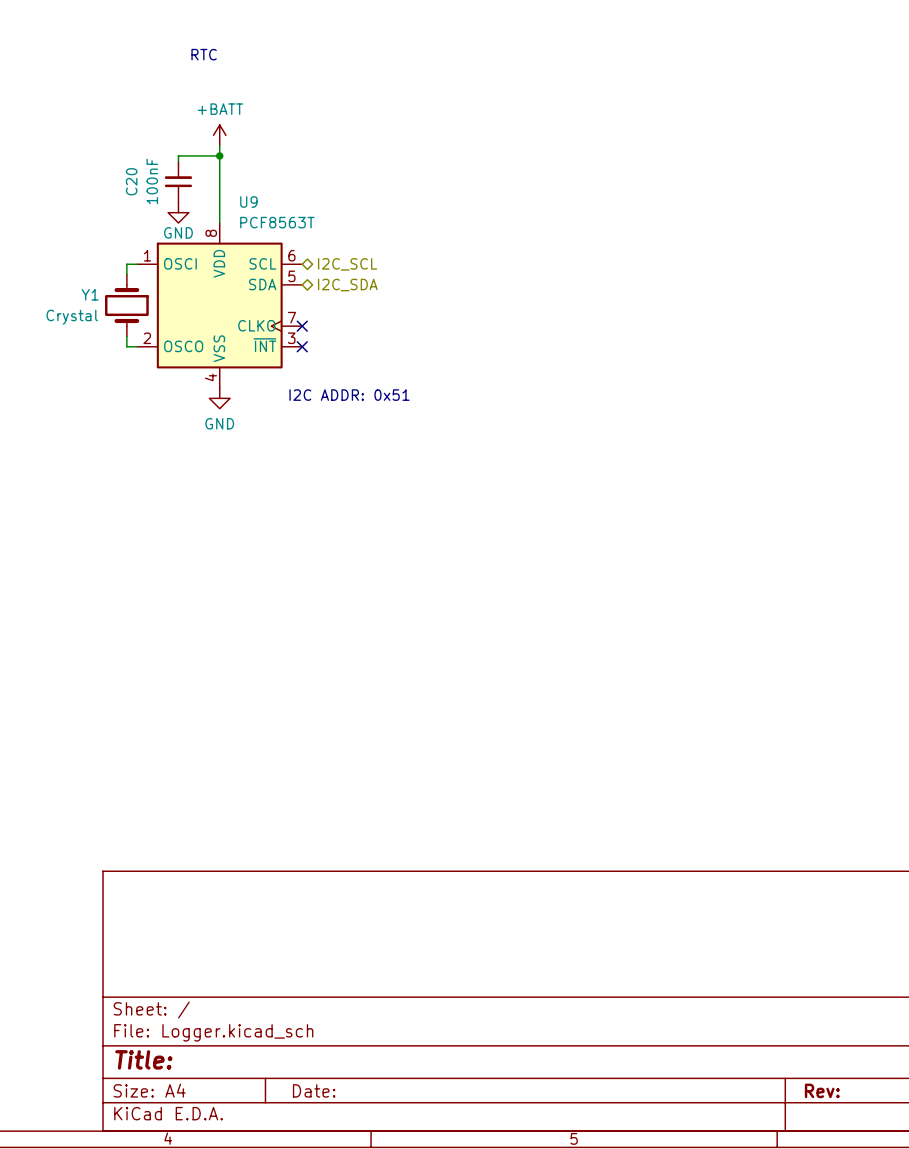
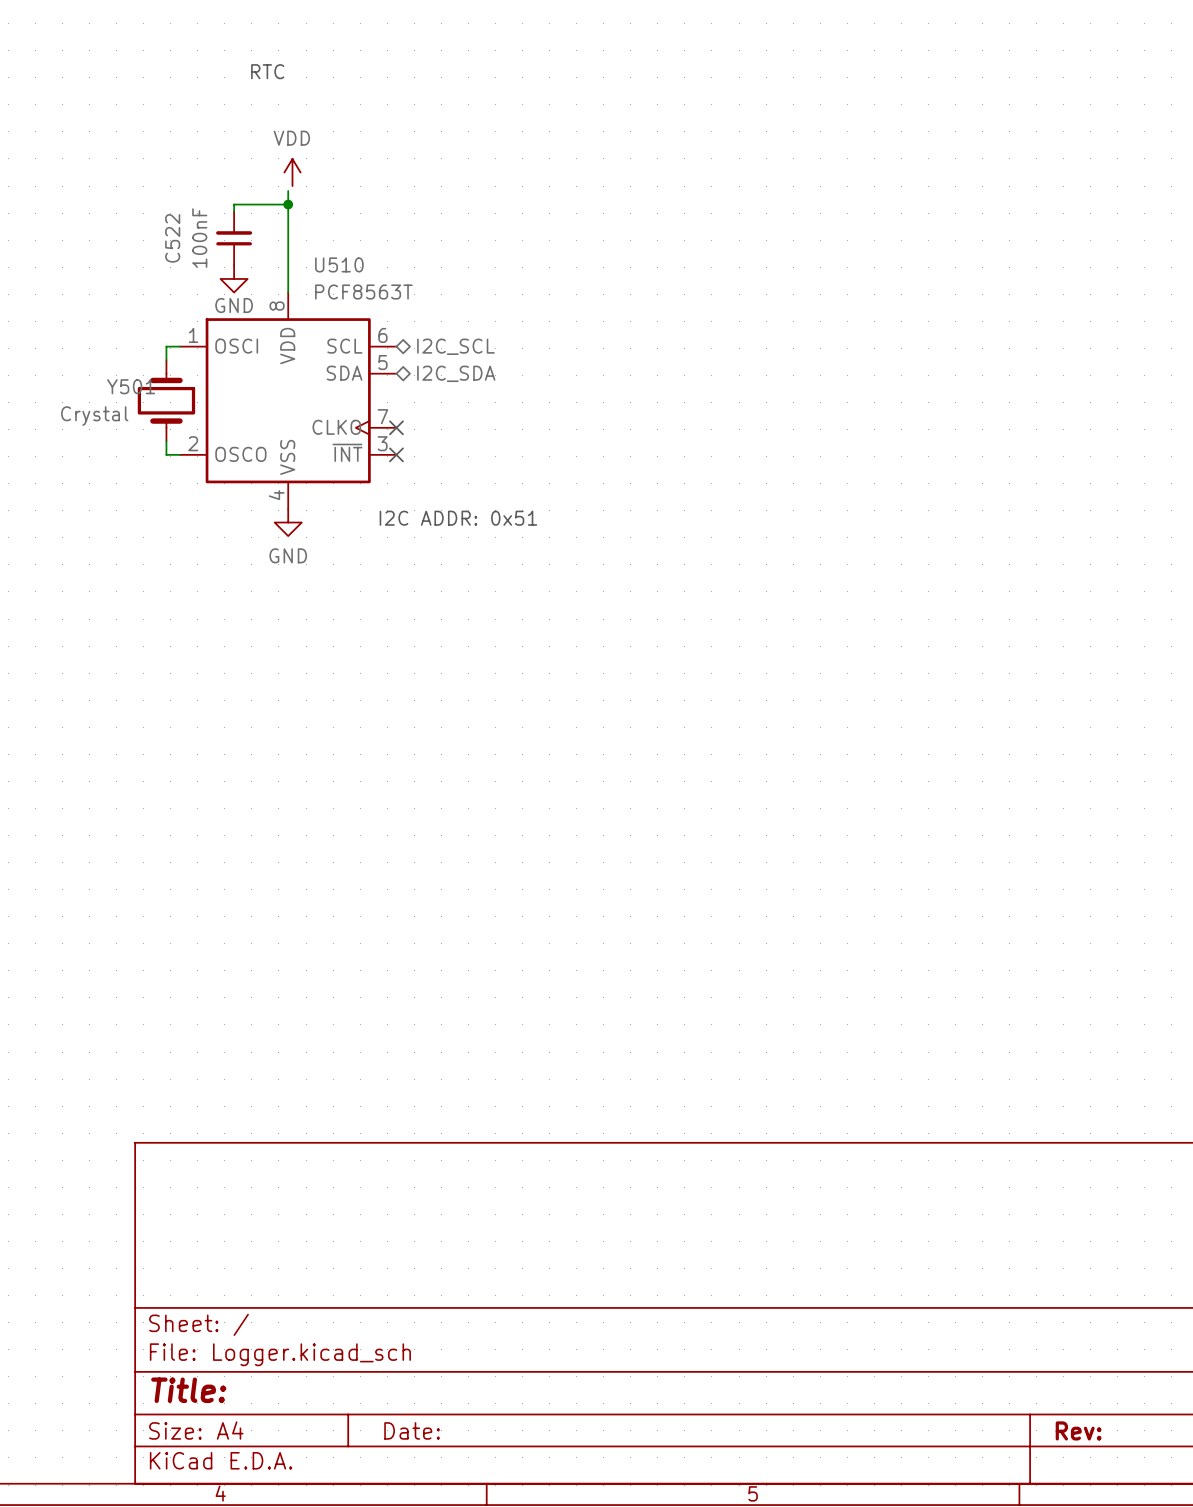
power symbol: +BATT (219, 135) -> VDD (292, 172)
C20 name: C20 (131, 181) -> C522 (172, 238)
U9 name: U9 (248, 201) -> U510 (339, 264)
Y1 name: Y1 (90, 294) -> Y501 (131, 386)

